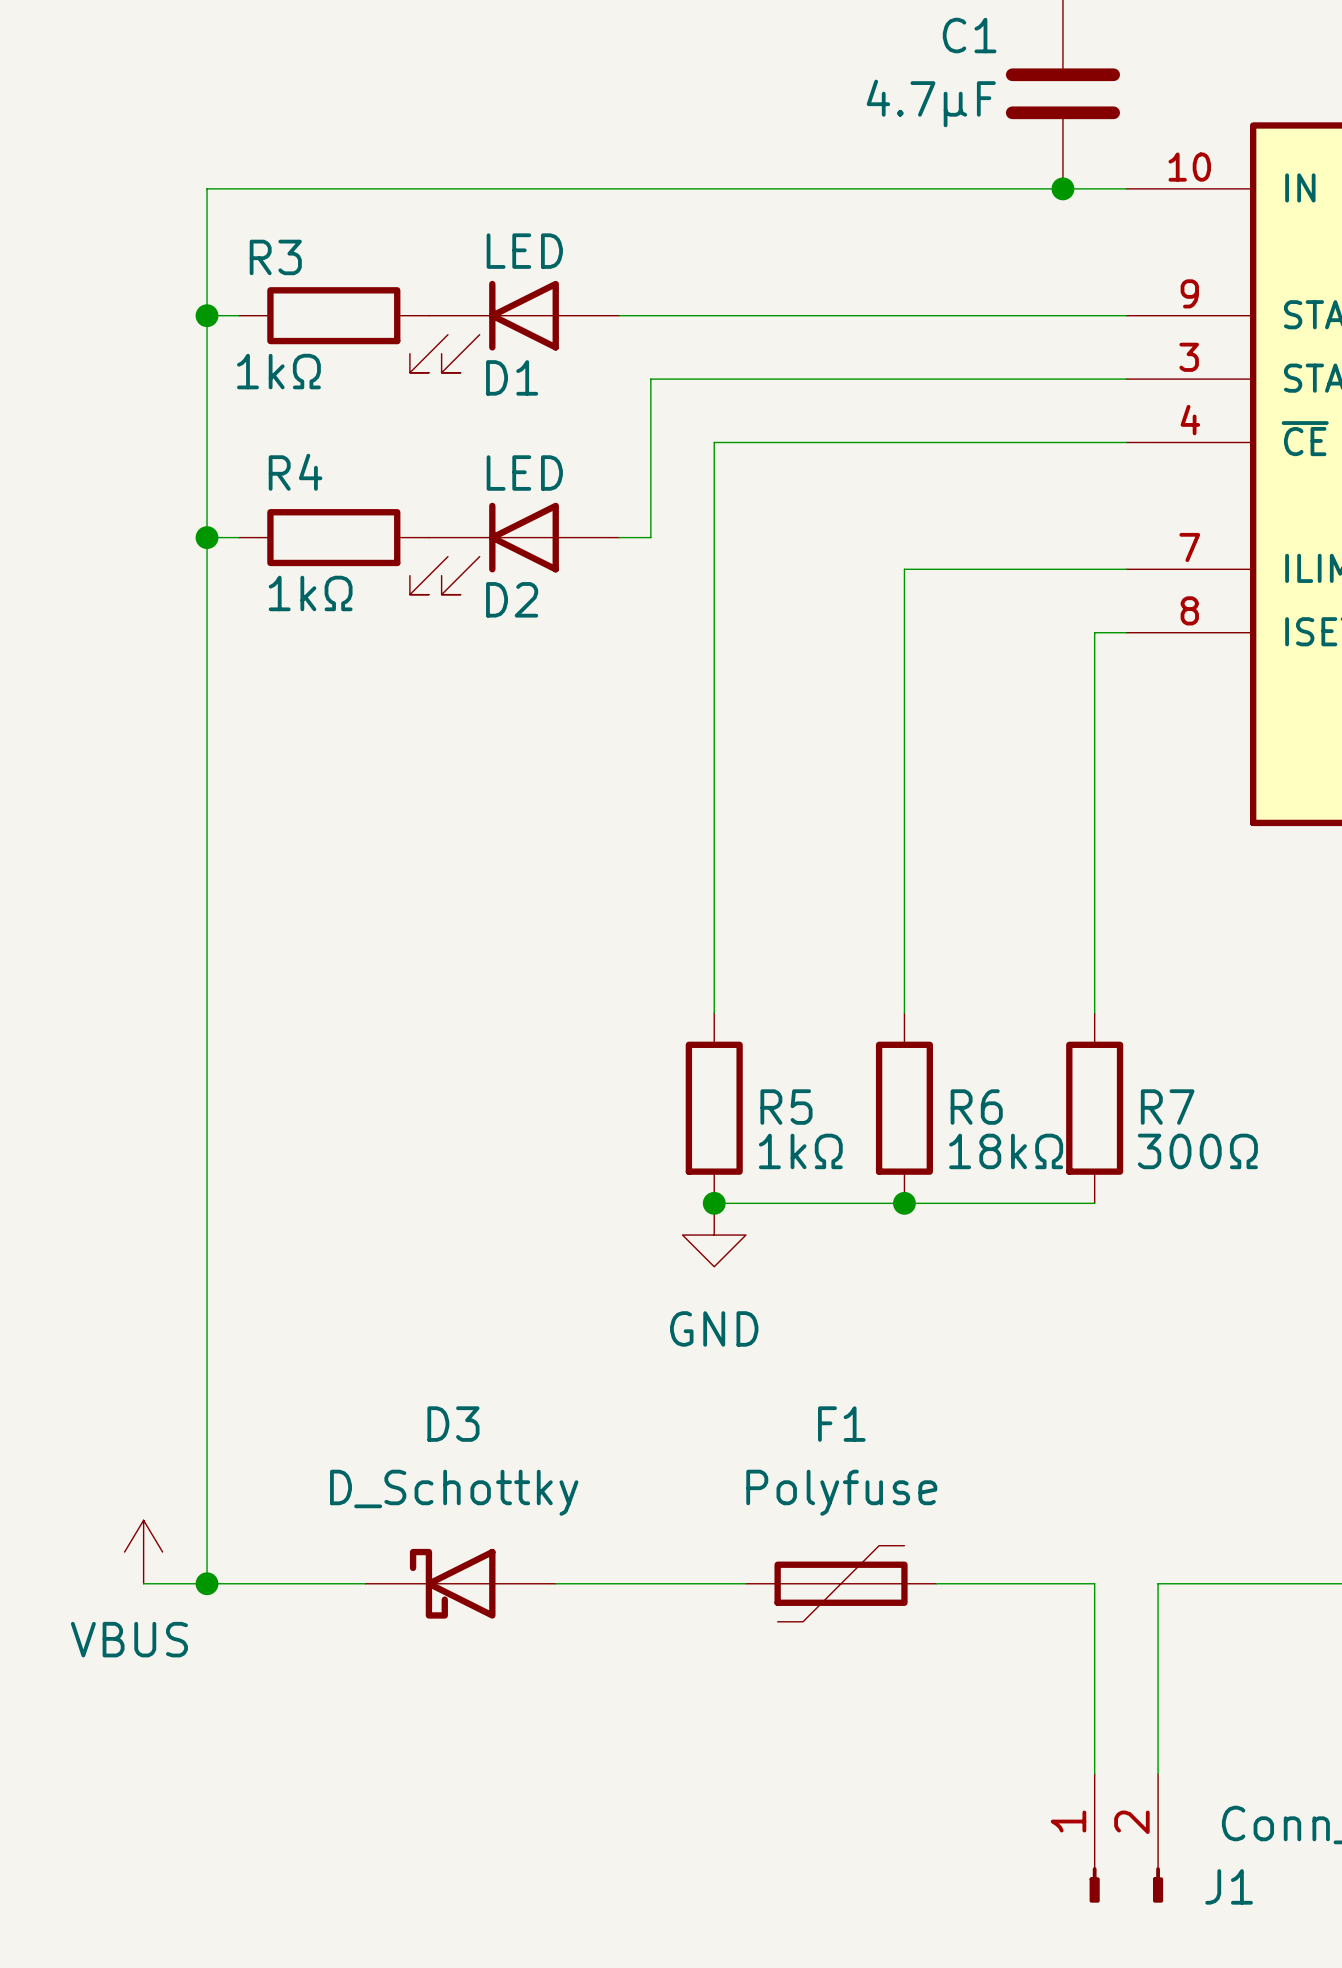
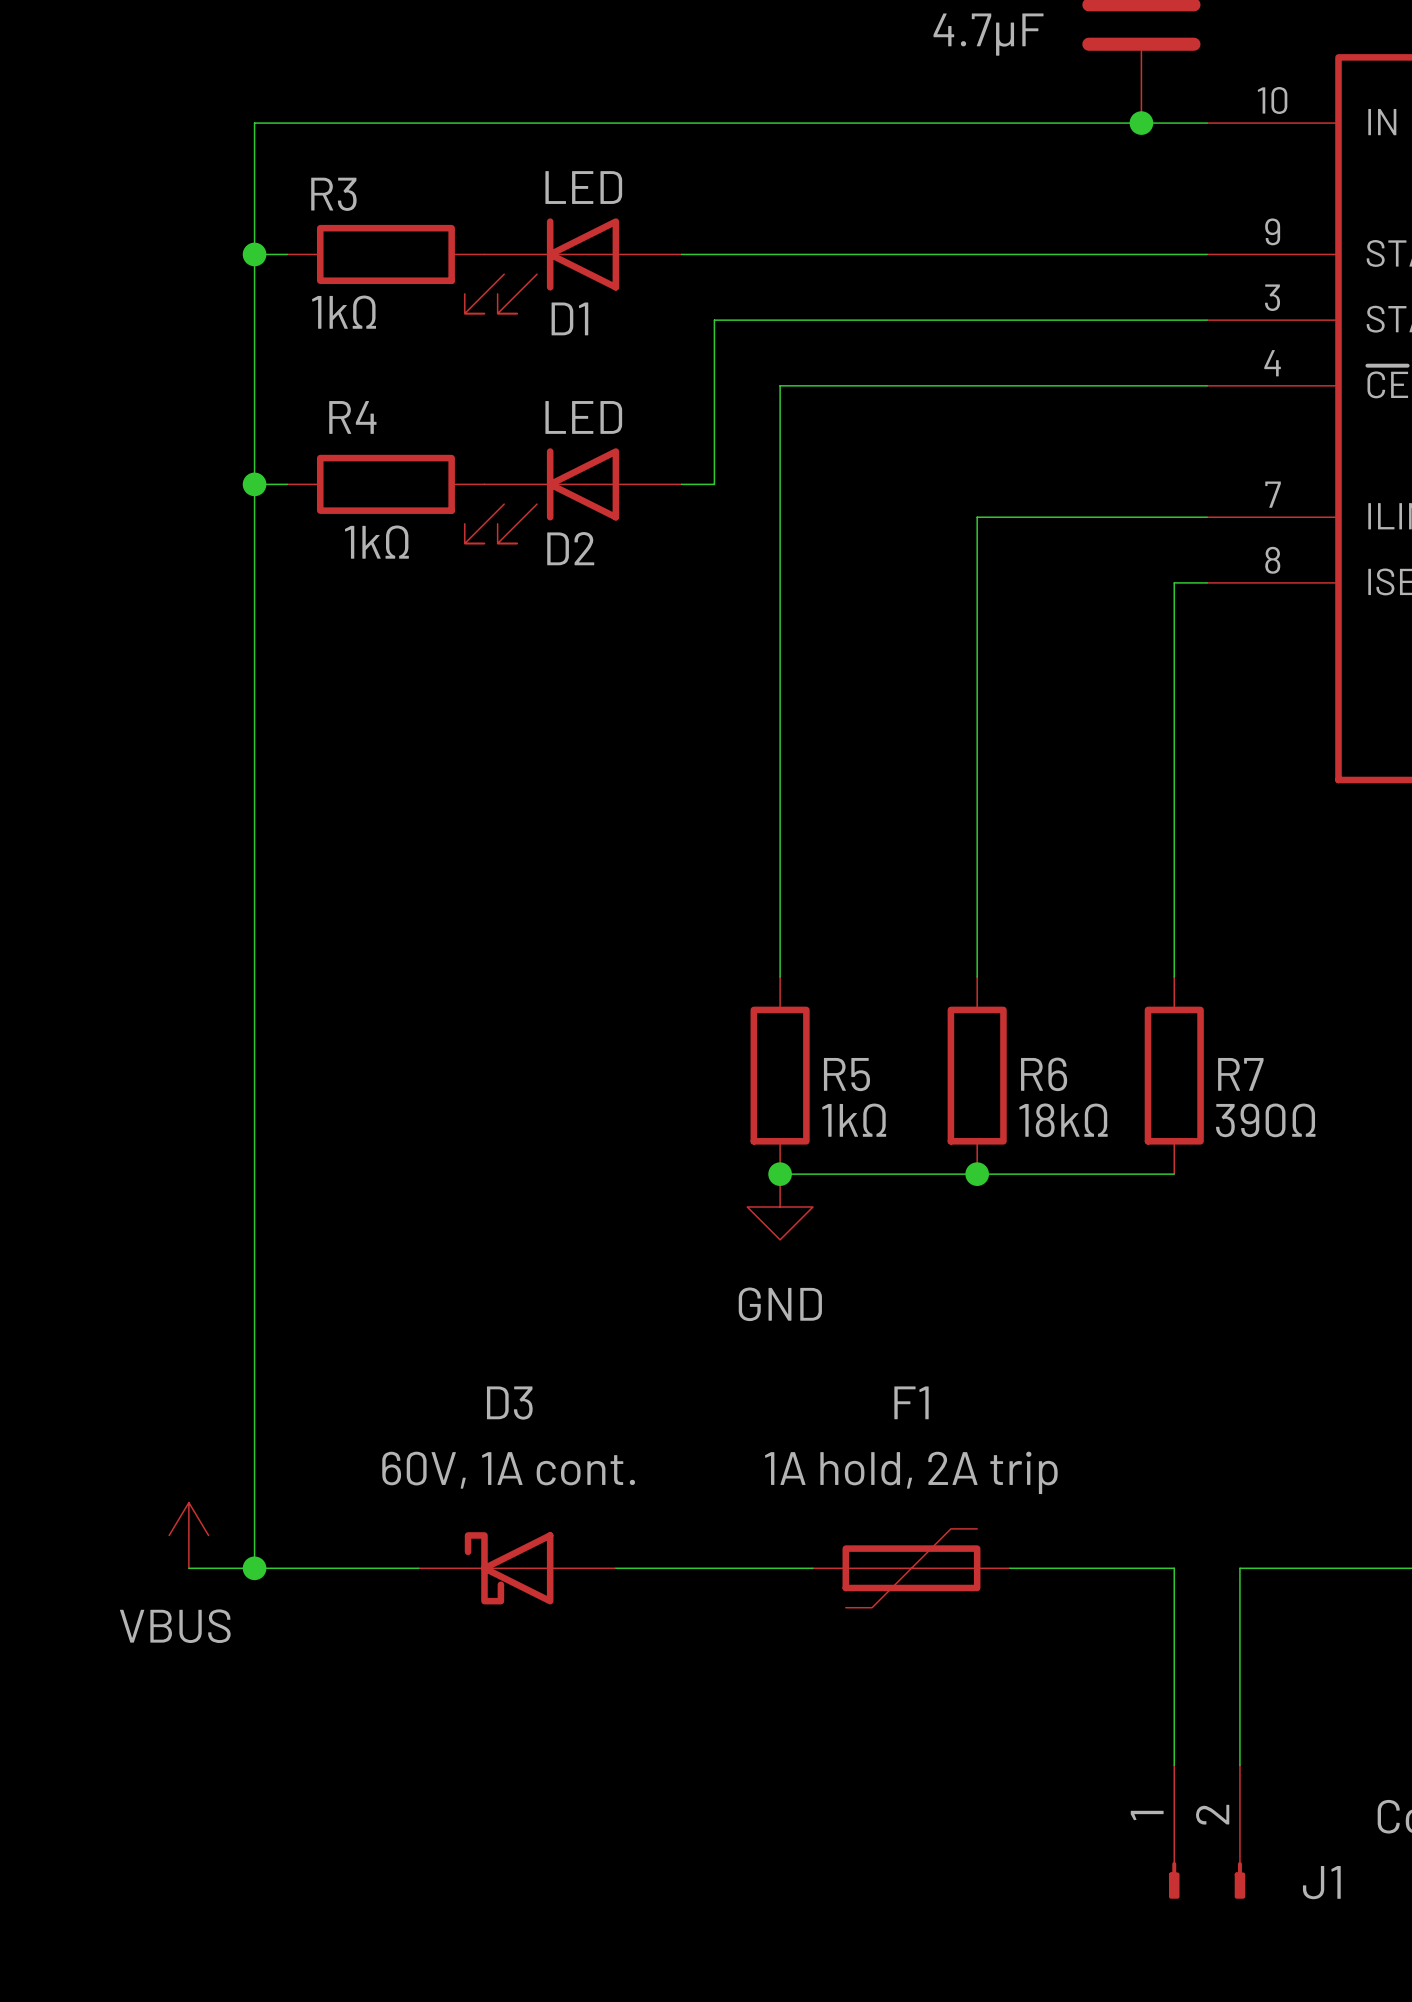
R7 value: 300Ω (1197, 1151) -> 390Ω (1265, 1120)
D3 value: D_Schottky (454, 1492) -> 60V, 1A cont. (508, 1470)
F1 value: Polyfuse (841, 1492) -> 1A hold, 2A trip (911, 1472)

